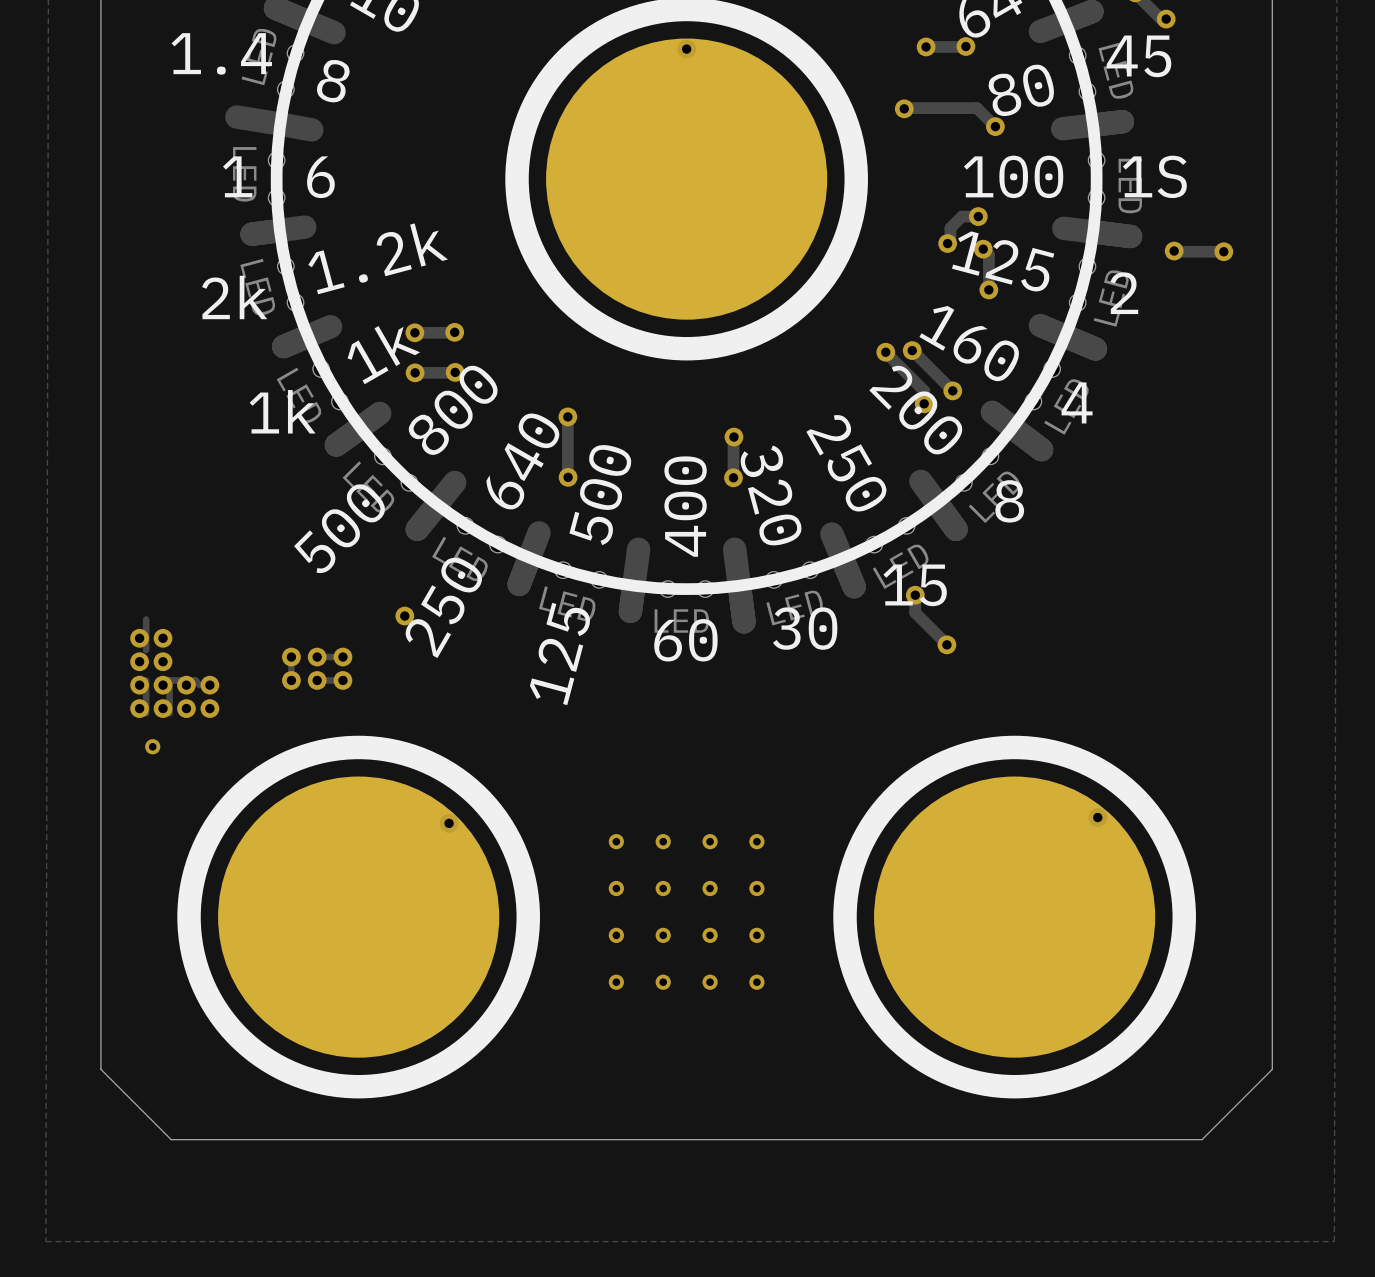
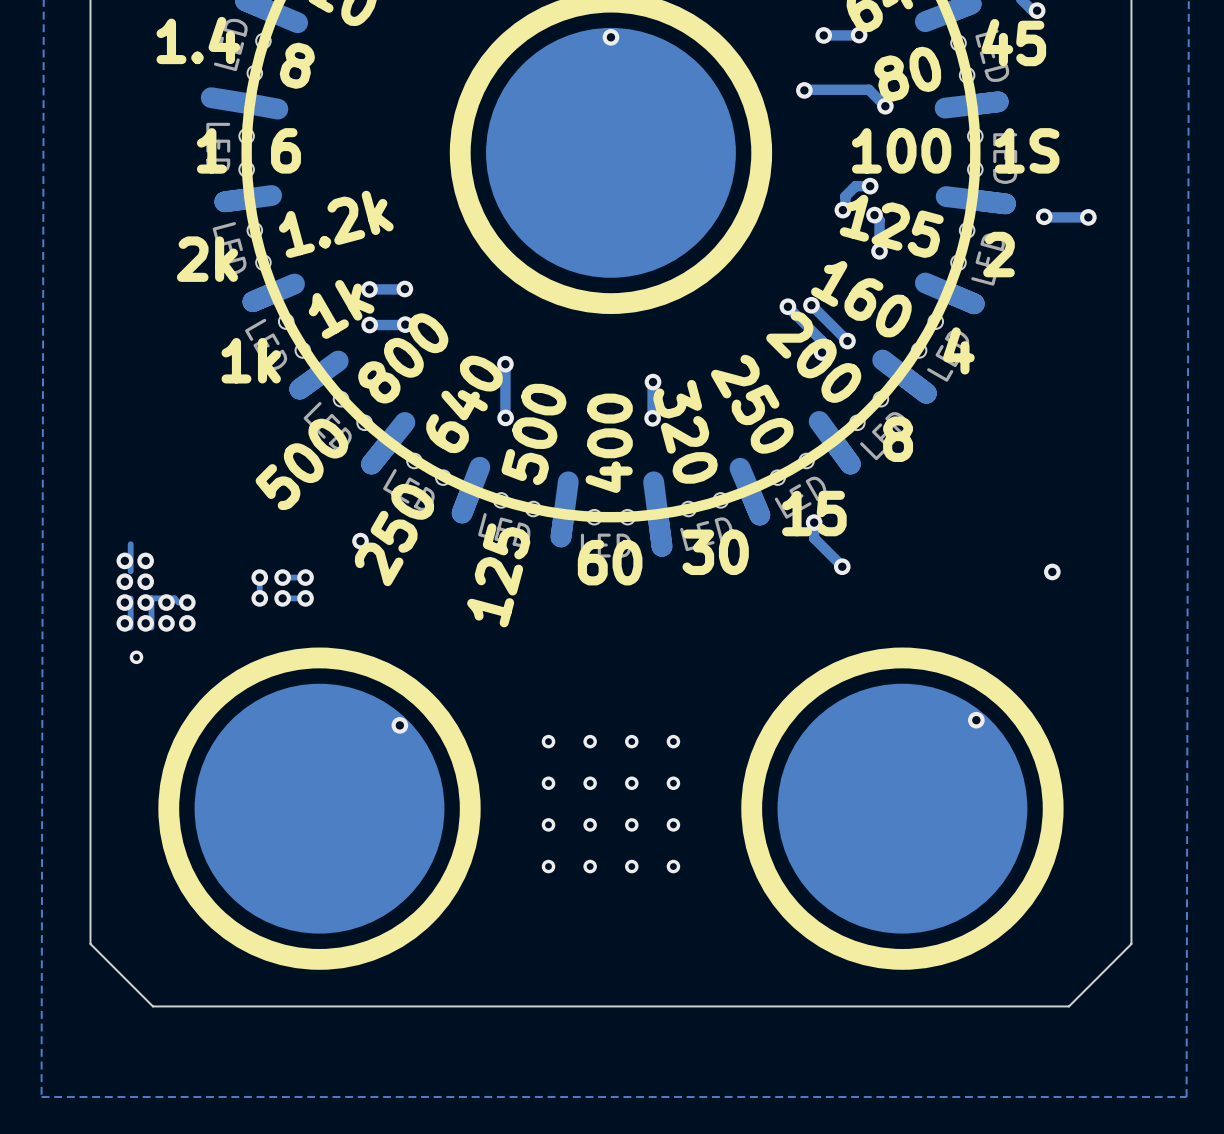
via: none -> (1052, 571)

